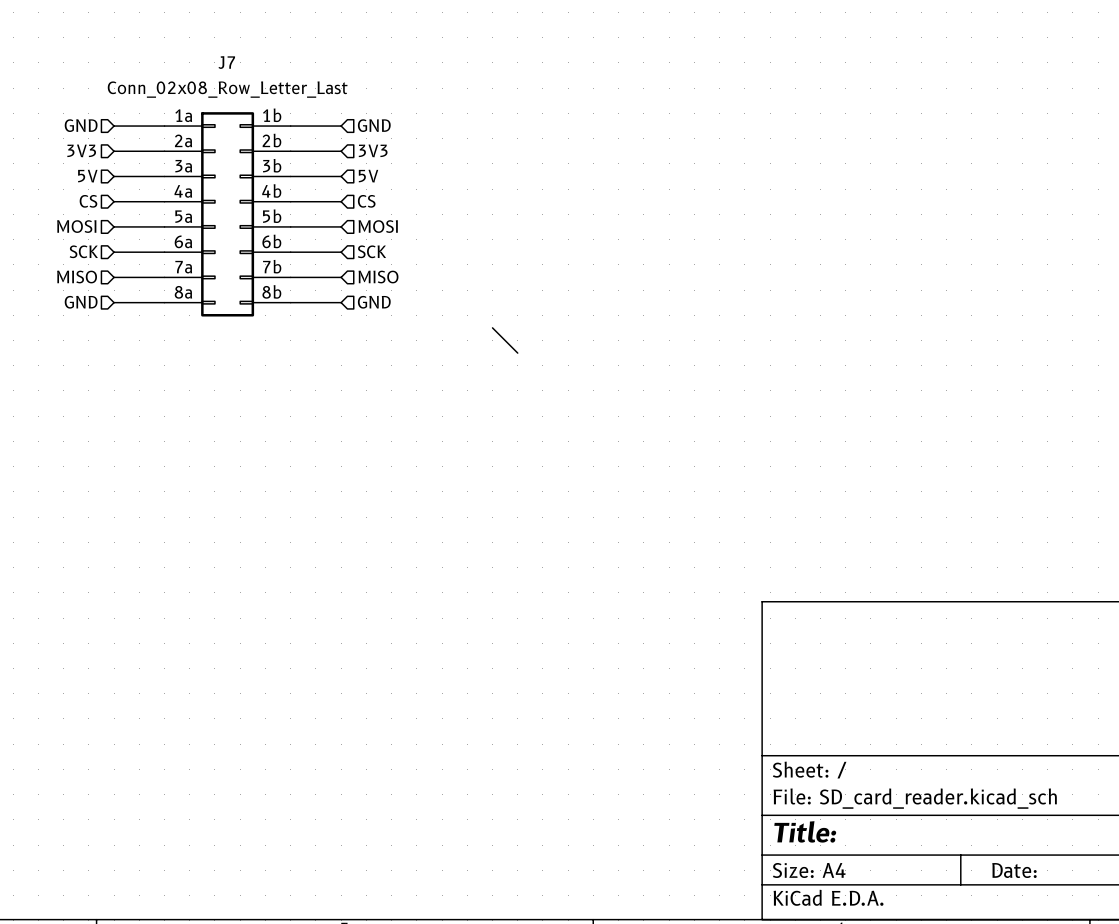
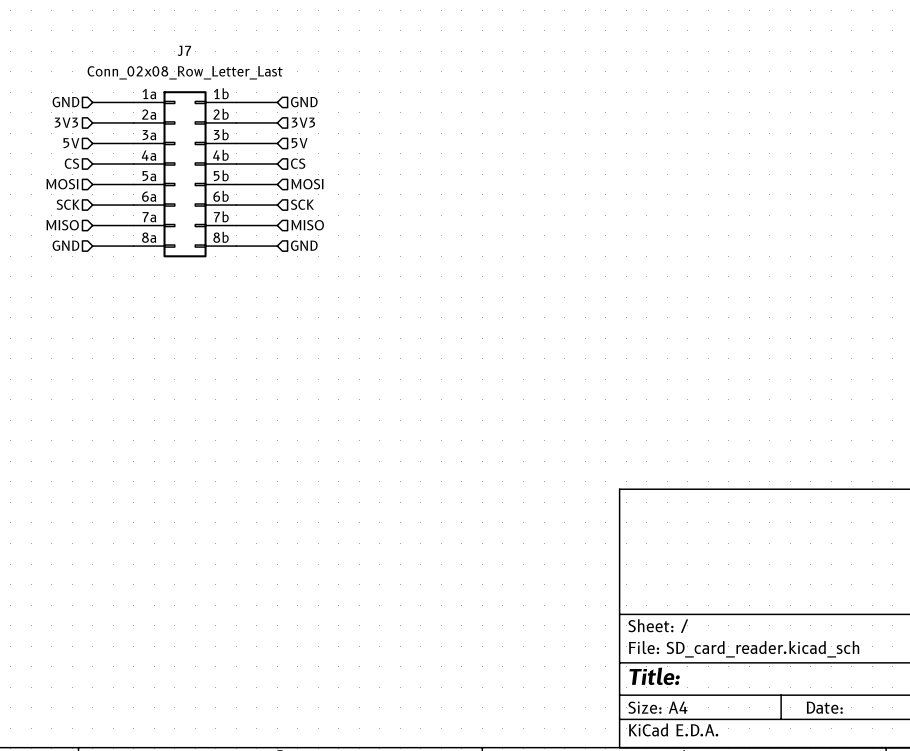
wire: (492, 327) (517, 353) -> none

